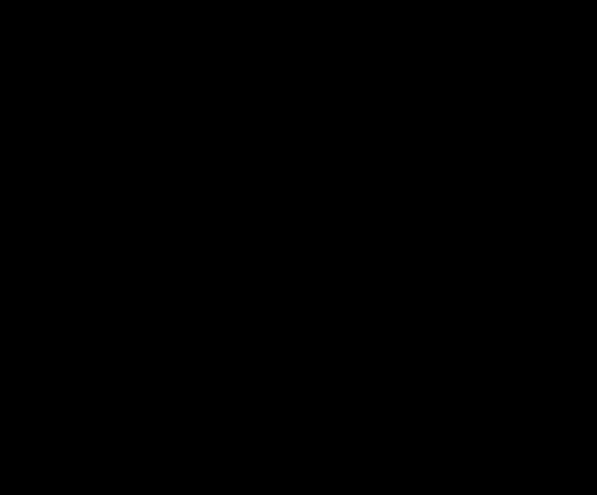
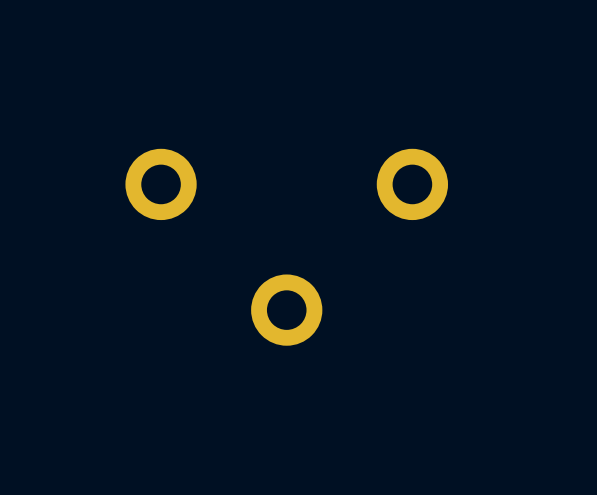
part: none -> (286, 247)

